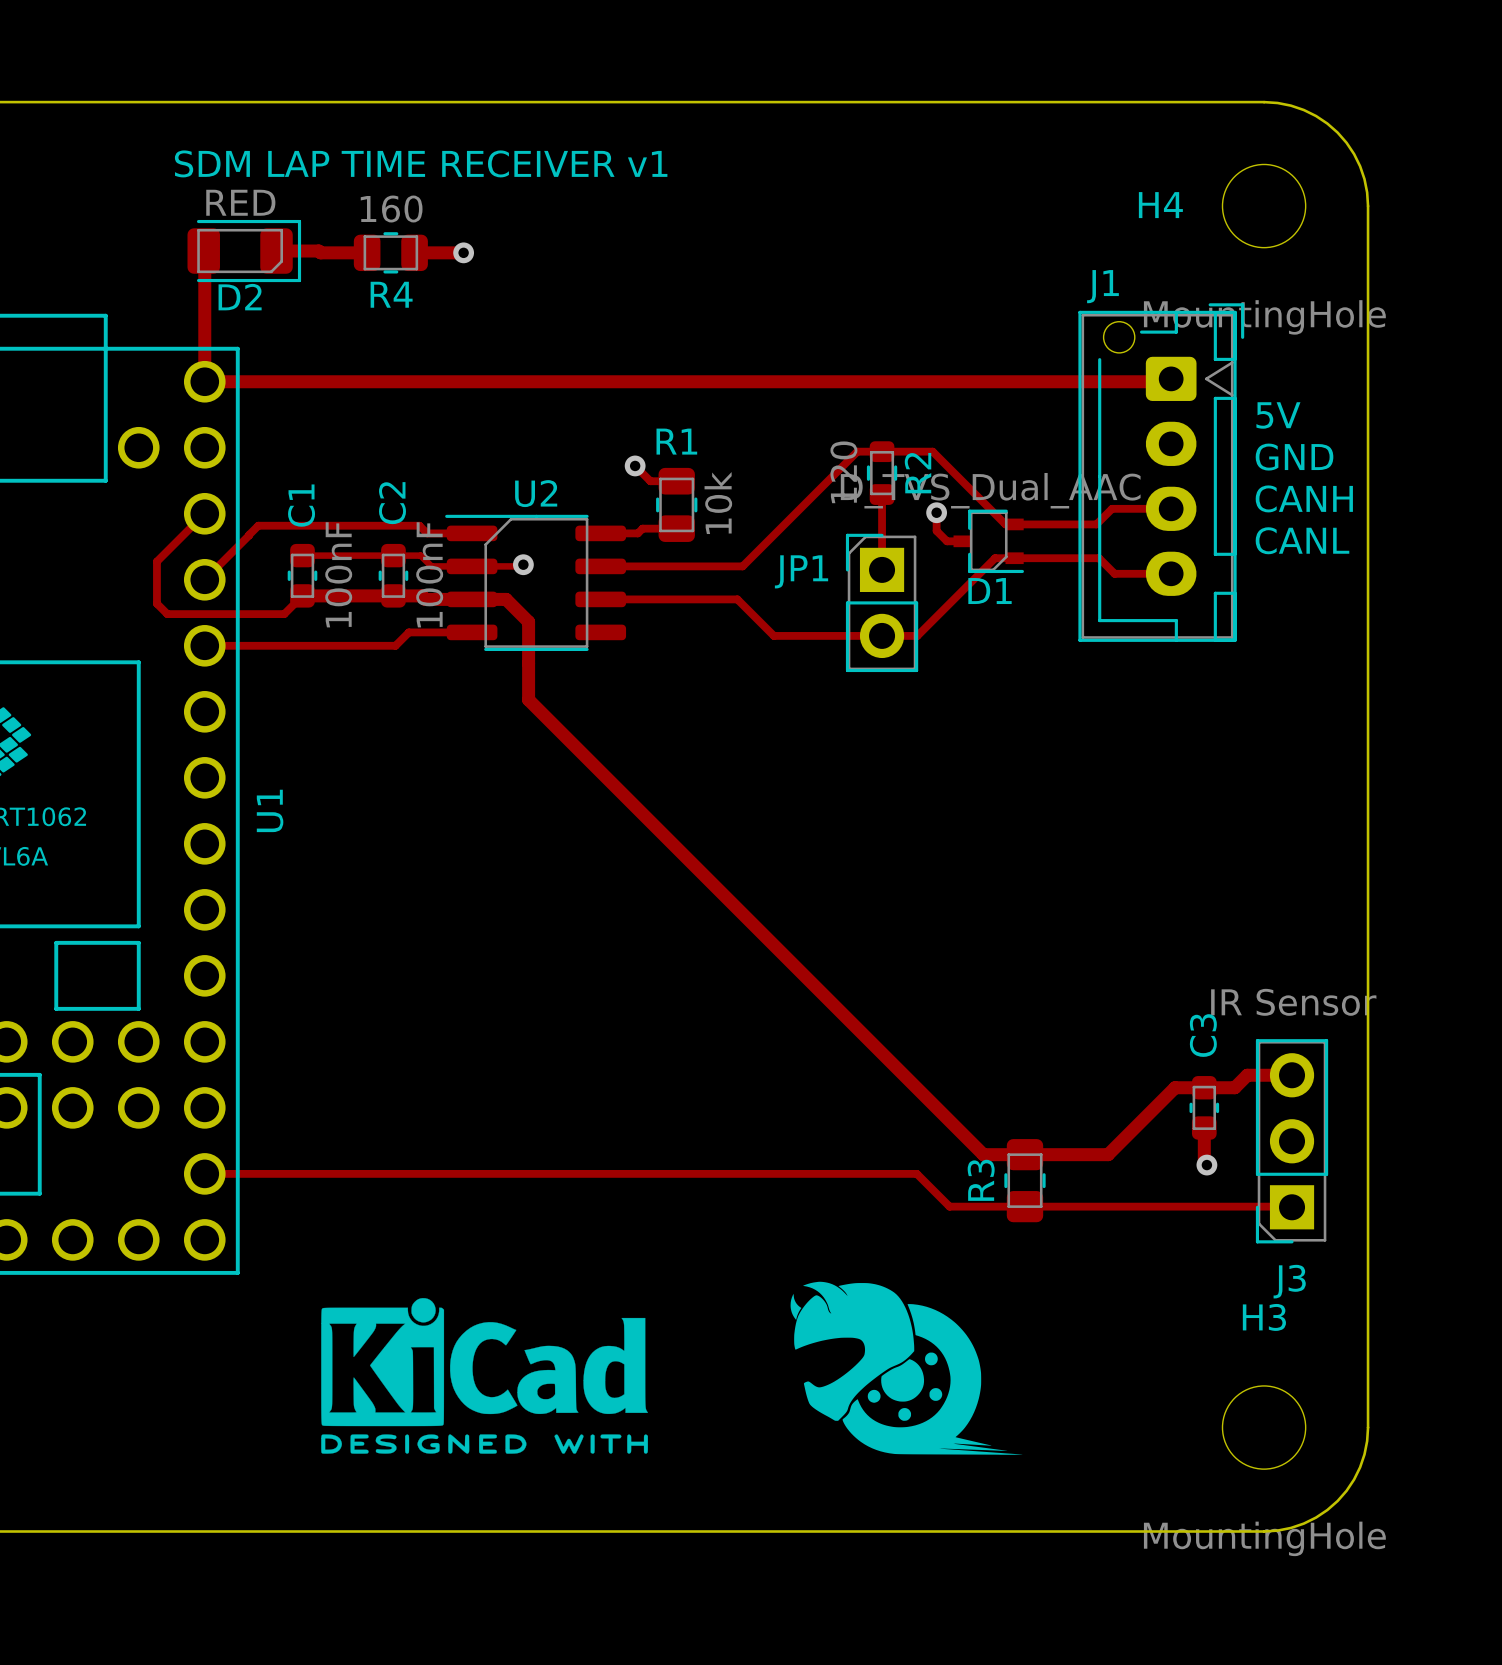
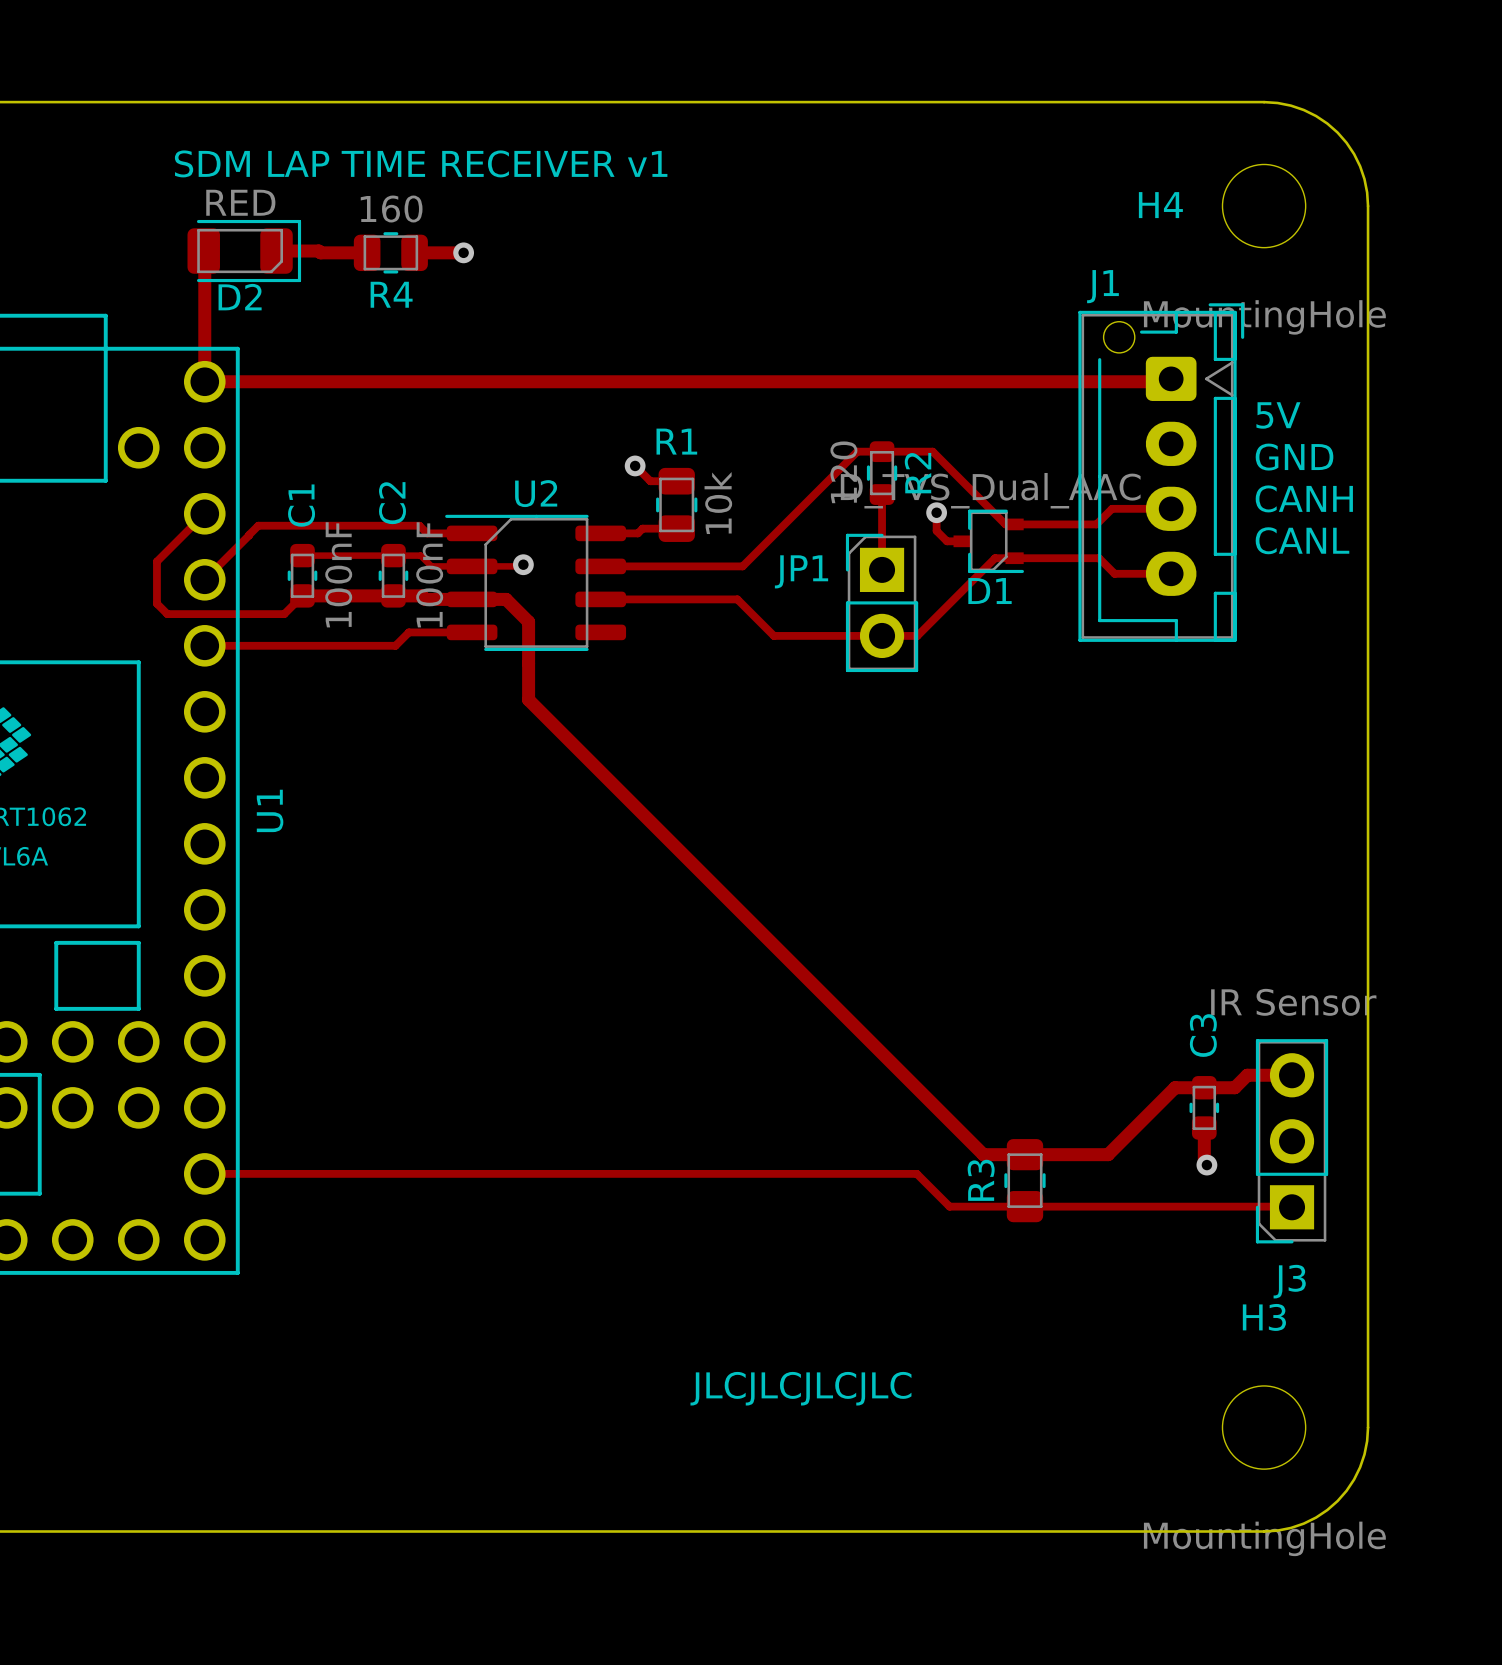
drawing: [790, 1281, 1023, 1455] -> none
drawing: [321, 1298, 648, 1454] -> none
text: none -> JLCJLCJLCJLC (800, 1388)

